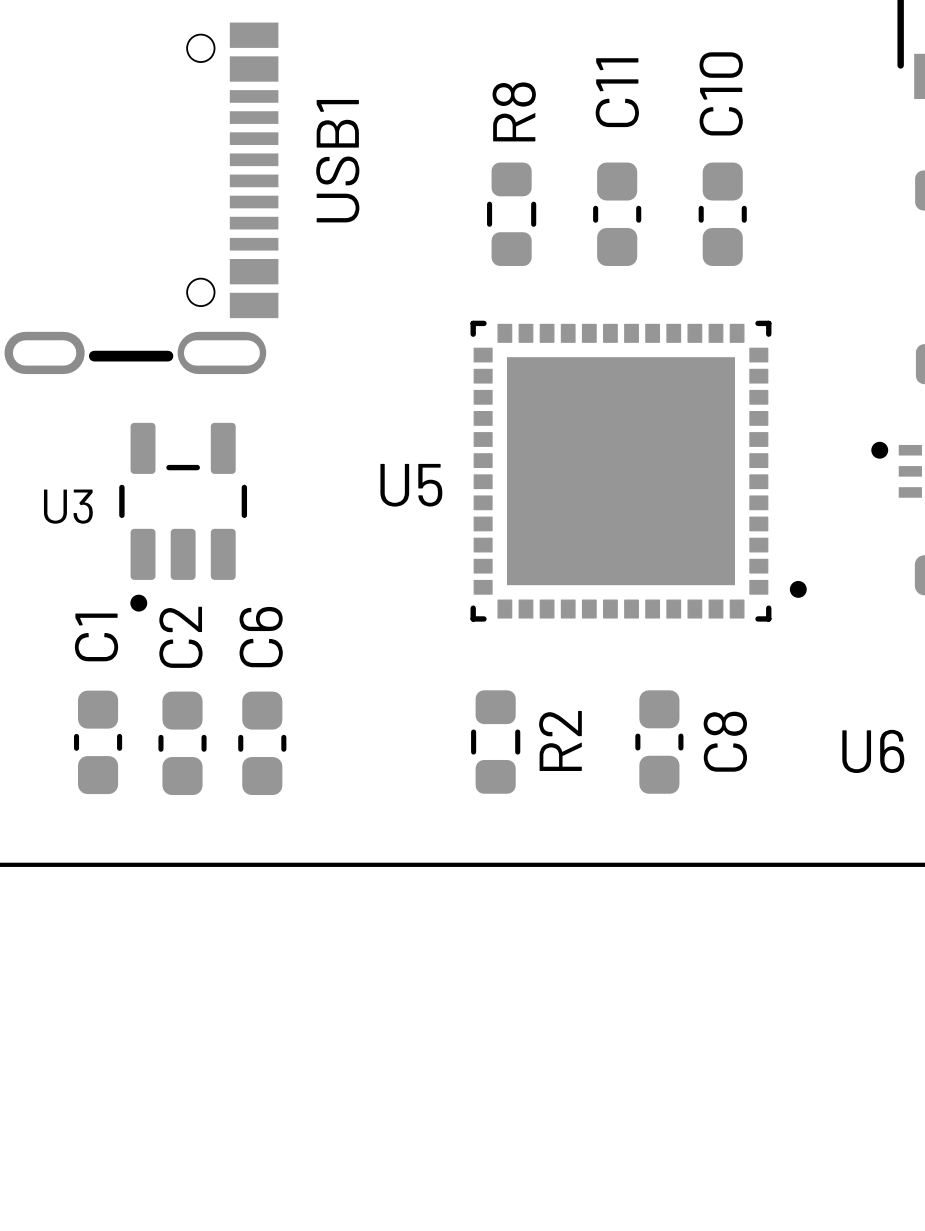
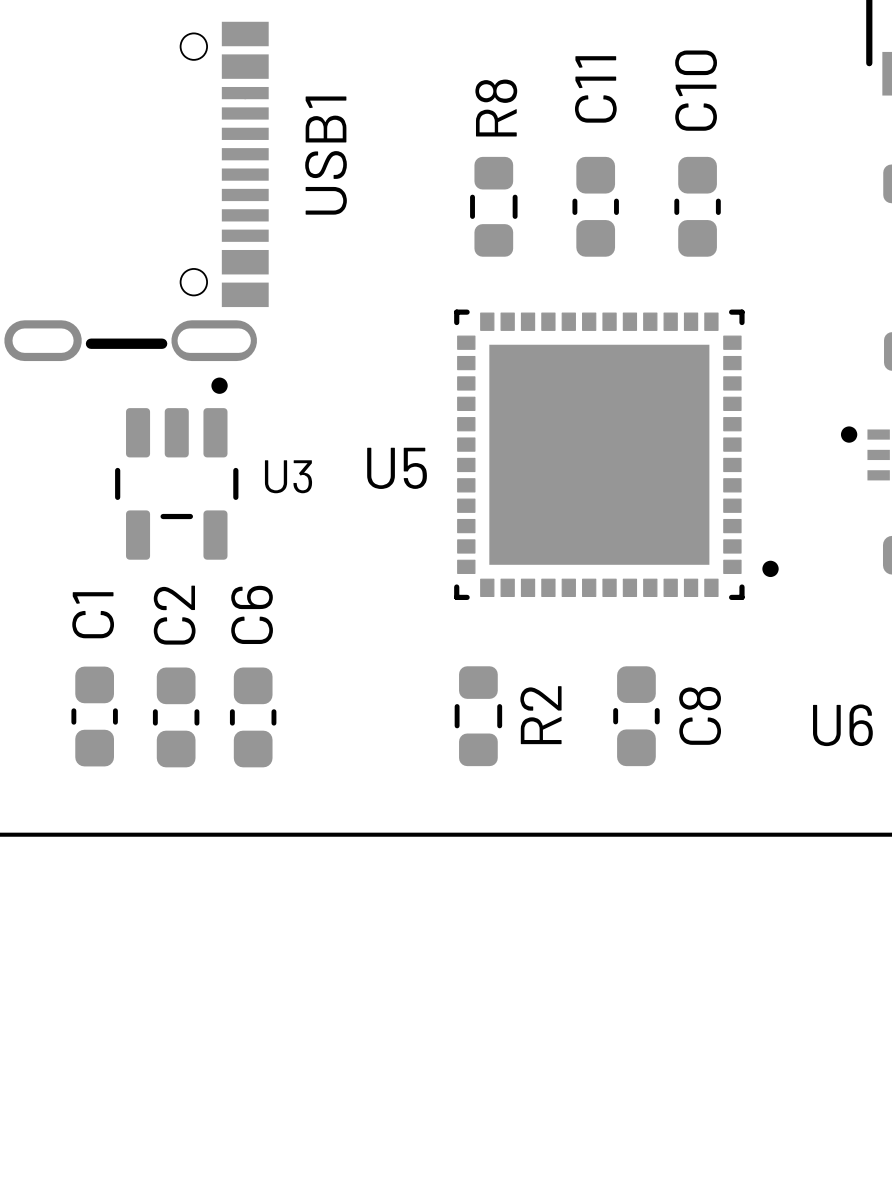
U3 rotation: 0° (183, 517) -> 180° (176, 468)

